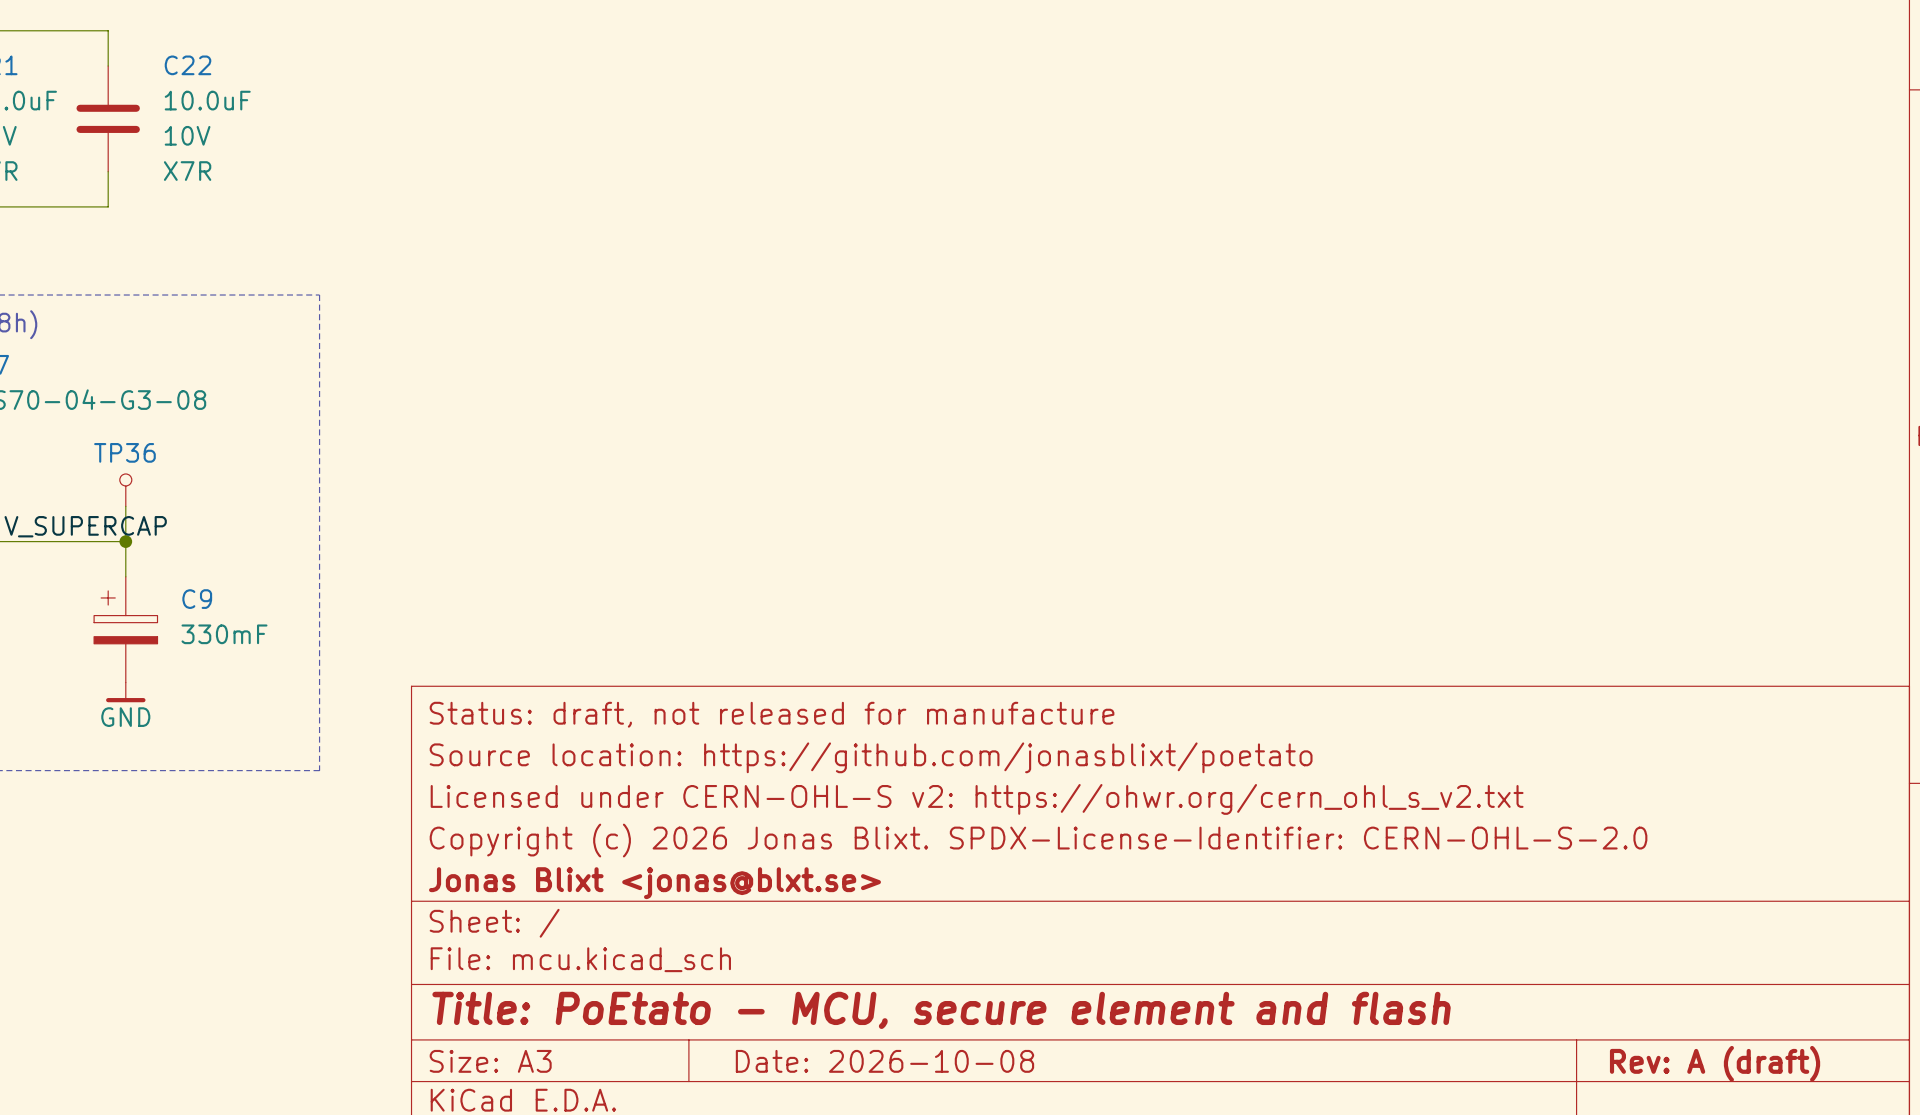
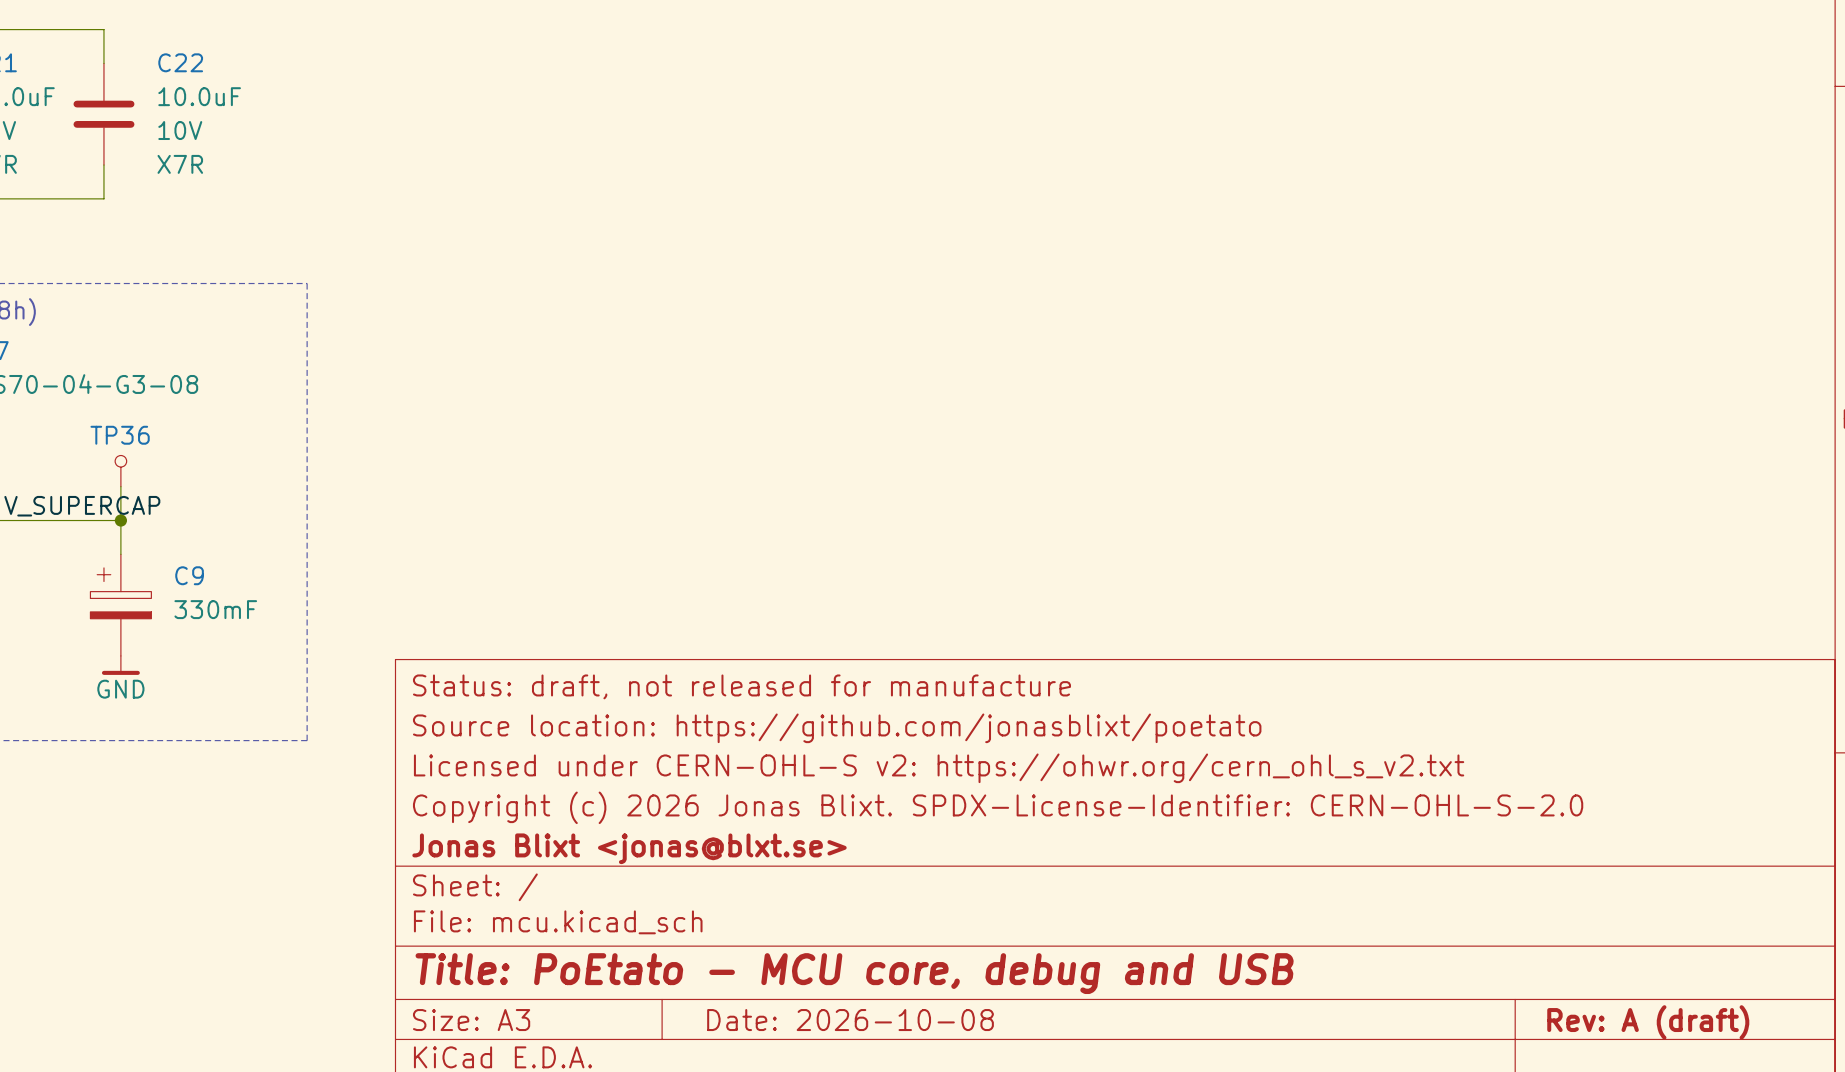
title block: Title: PoEtato - MCU, secure element and flash (941, 1010) -> Title: PoEtato - MCU core, debug and USB (854, 973)

